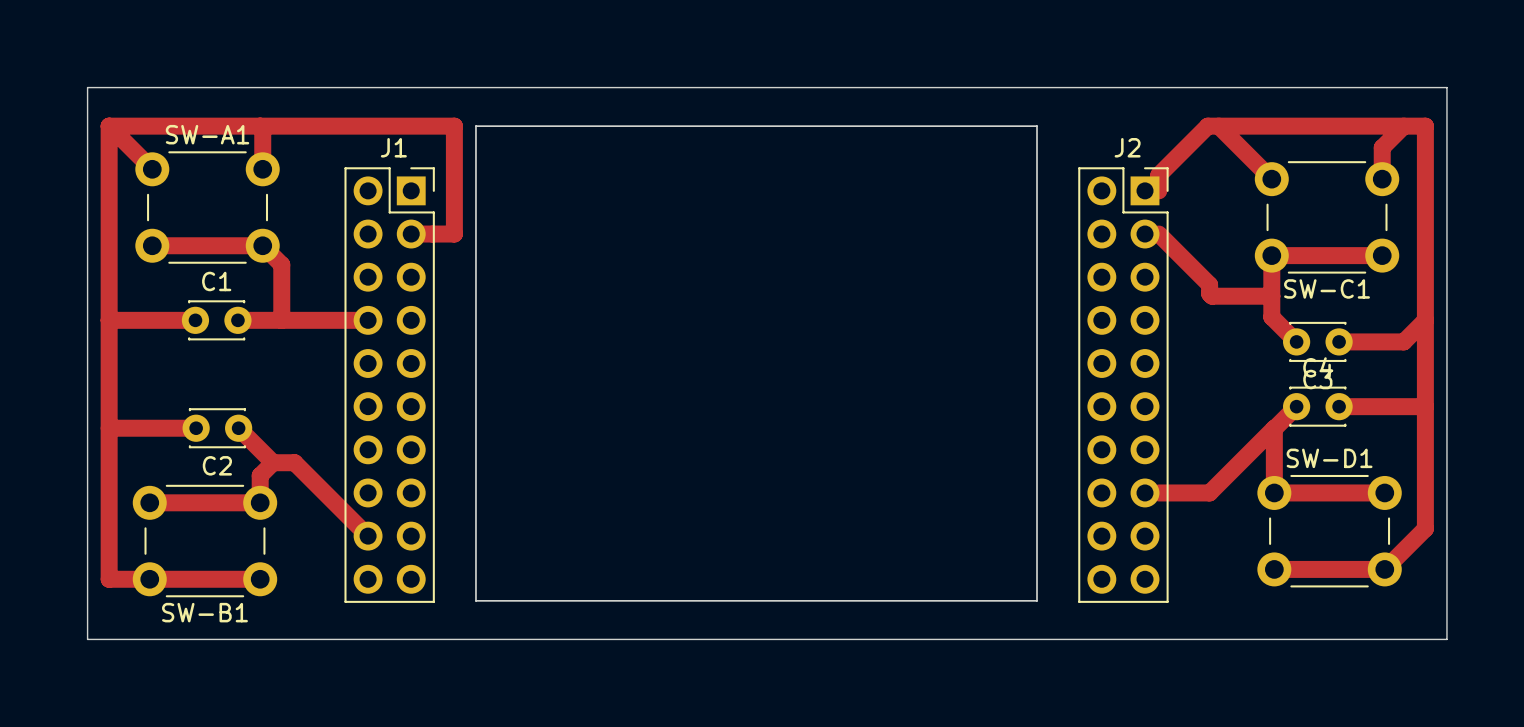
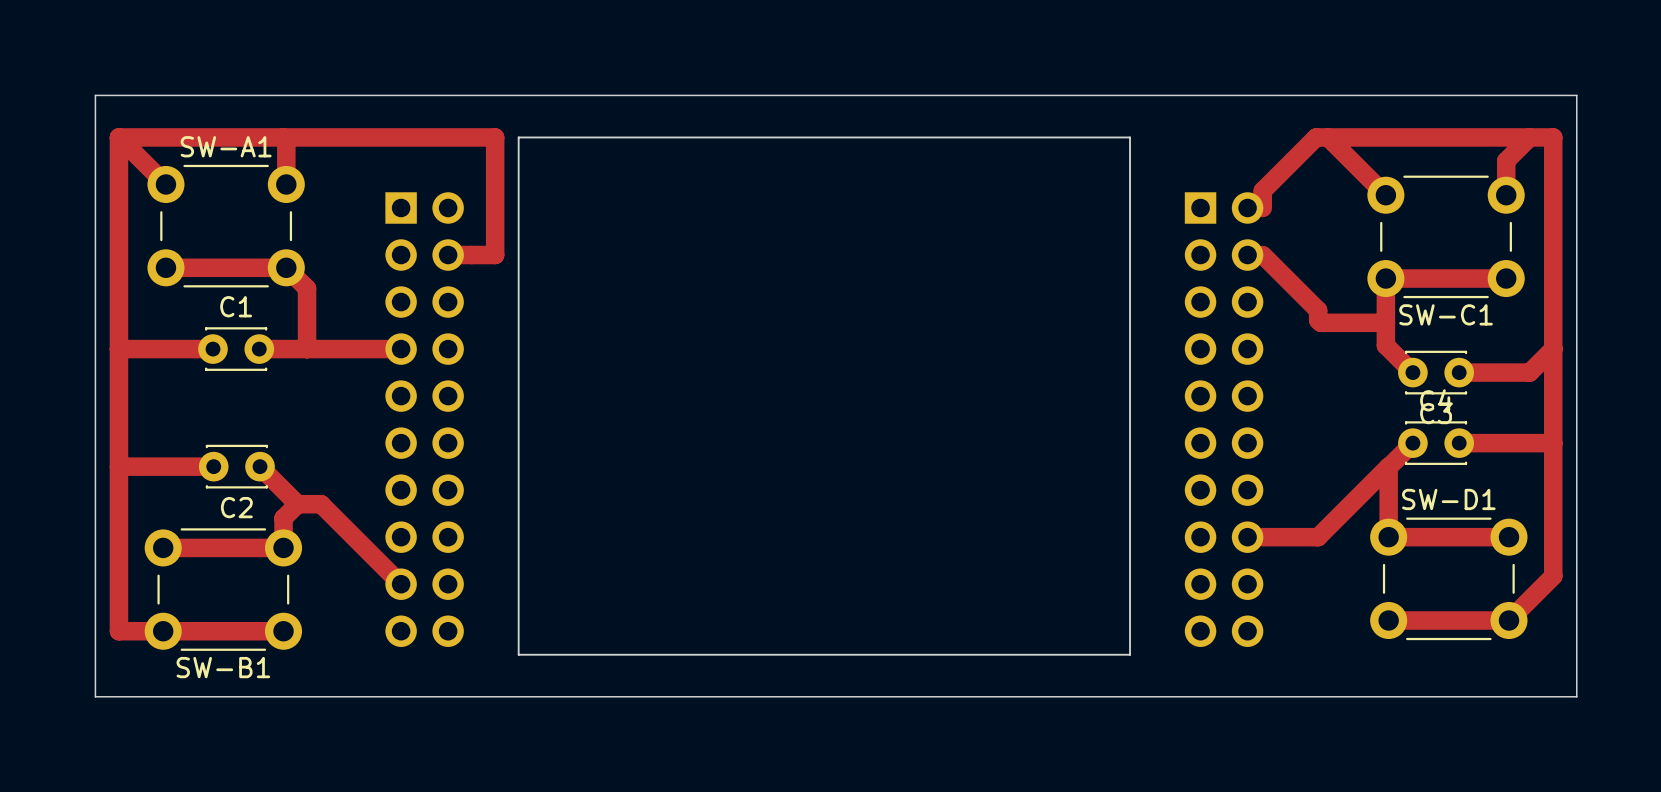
J1: (389, 385) -> none
part: none -> (424, 419)
J2: (1123, 385) -> none
part: none -> (1224, 419)

